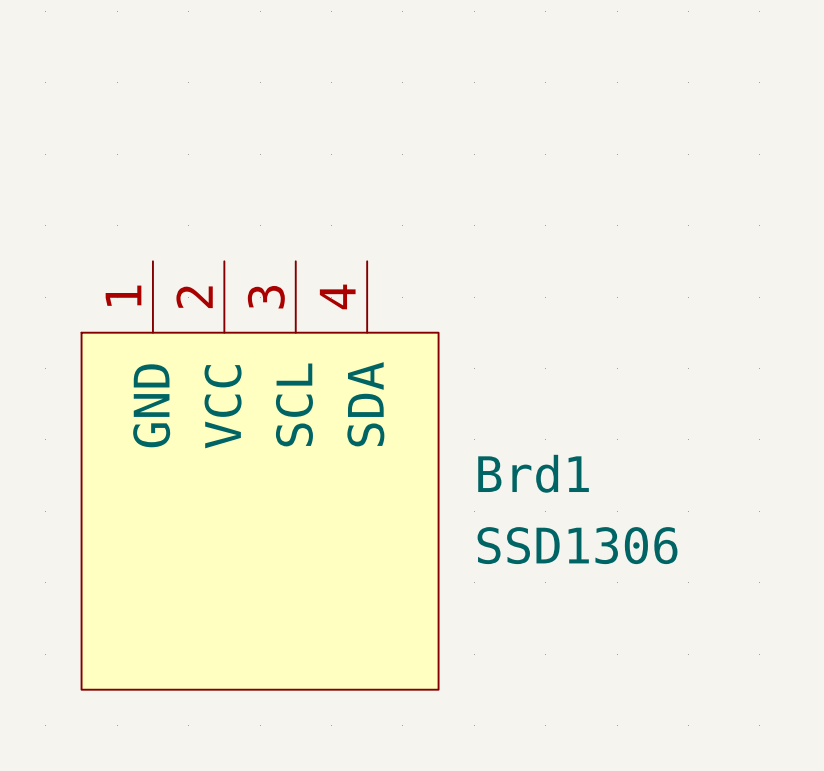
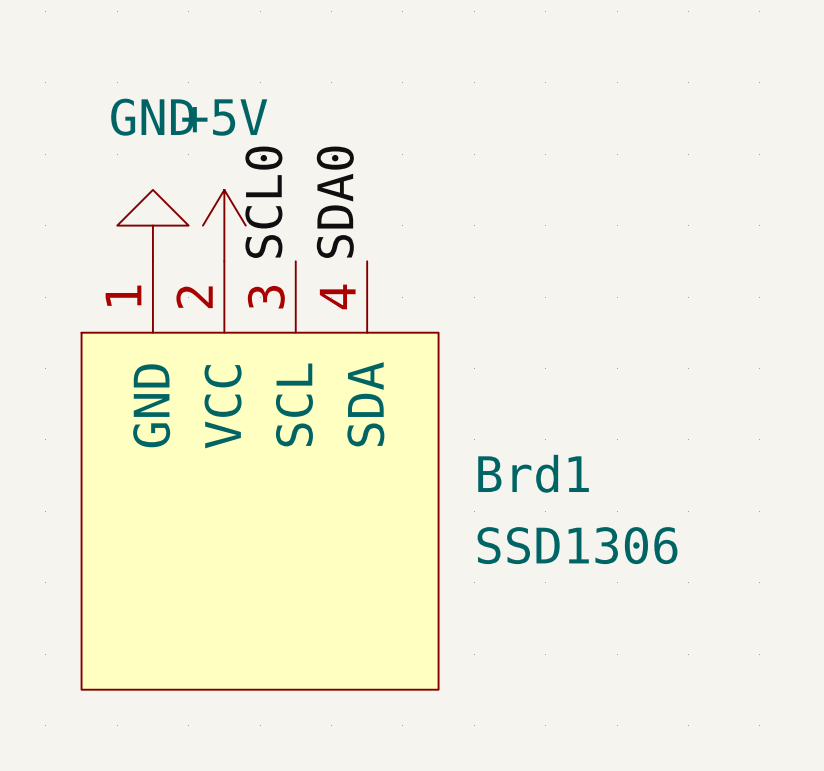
label: none -> SCL0 (263, 202)
label: none -> SDA0 (335, 202)
power symbol: none -> GND (152, 225)
power symbol: none -> +5V (224, 225)

